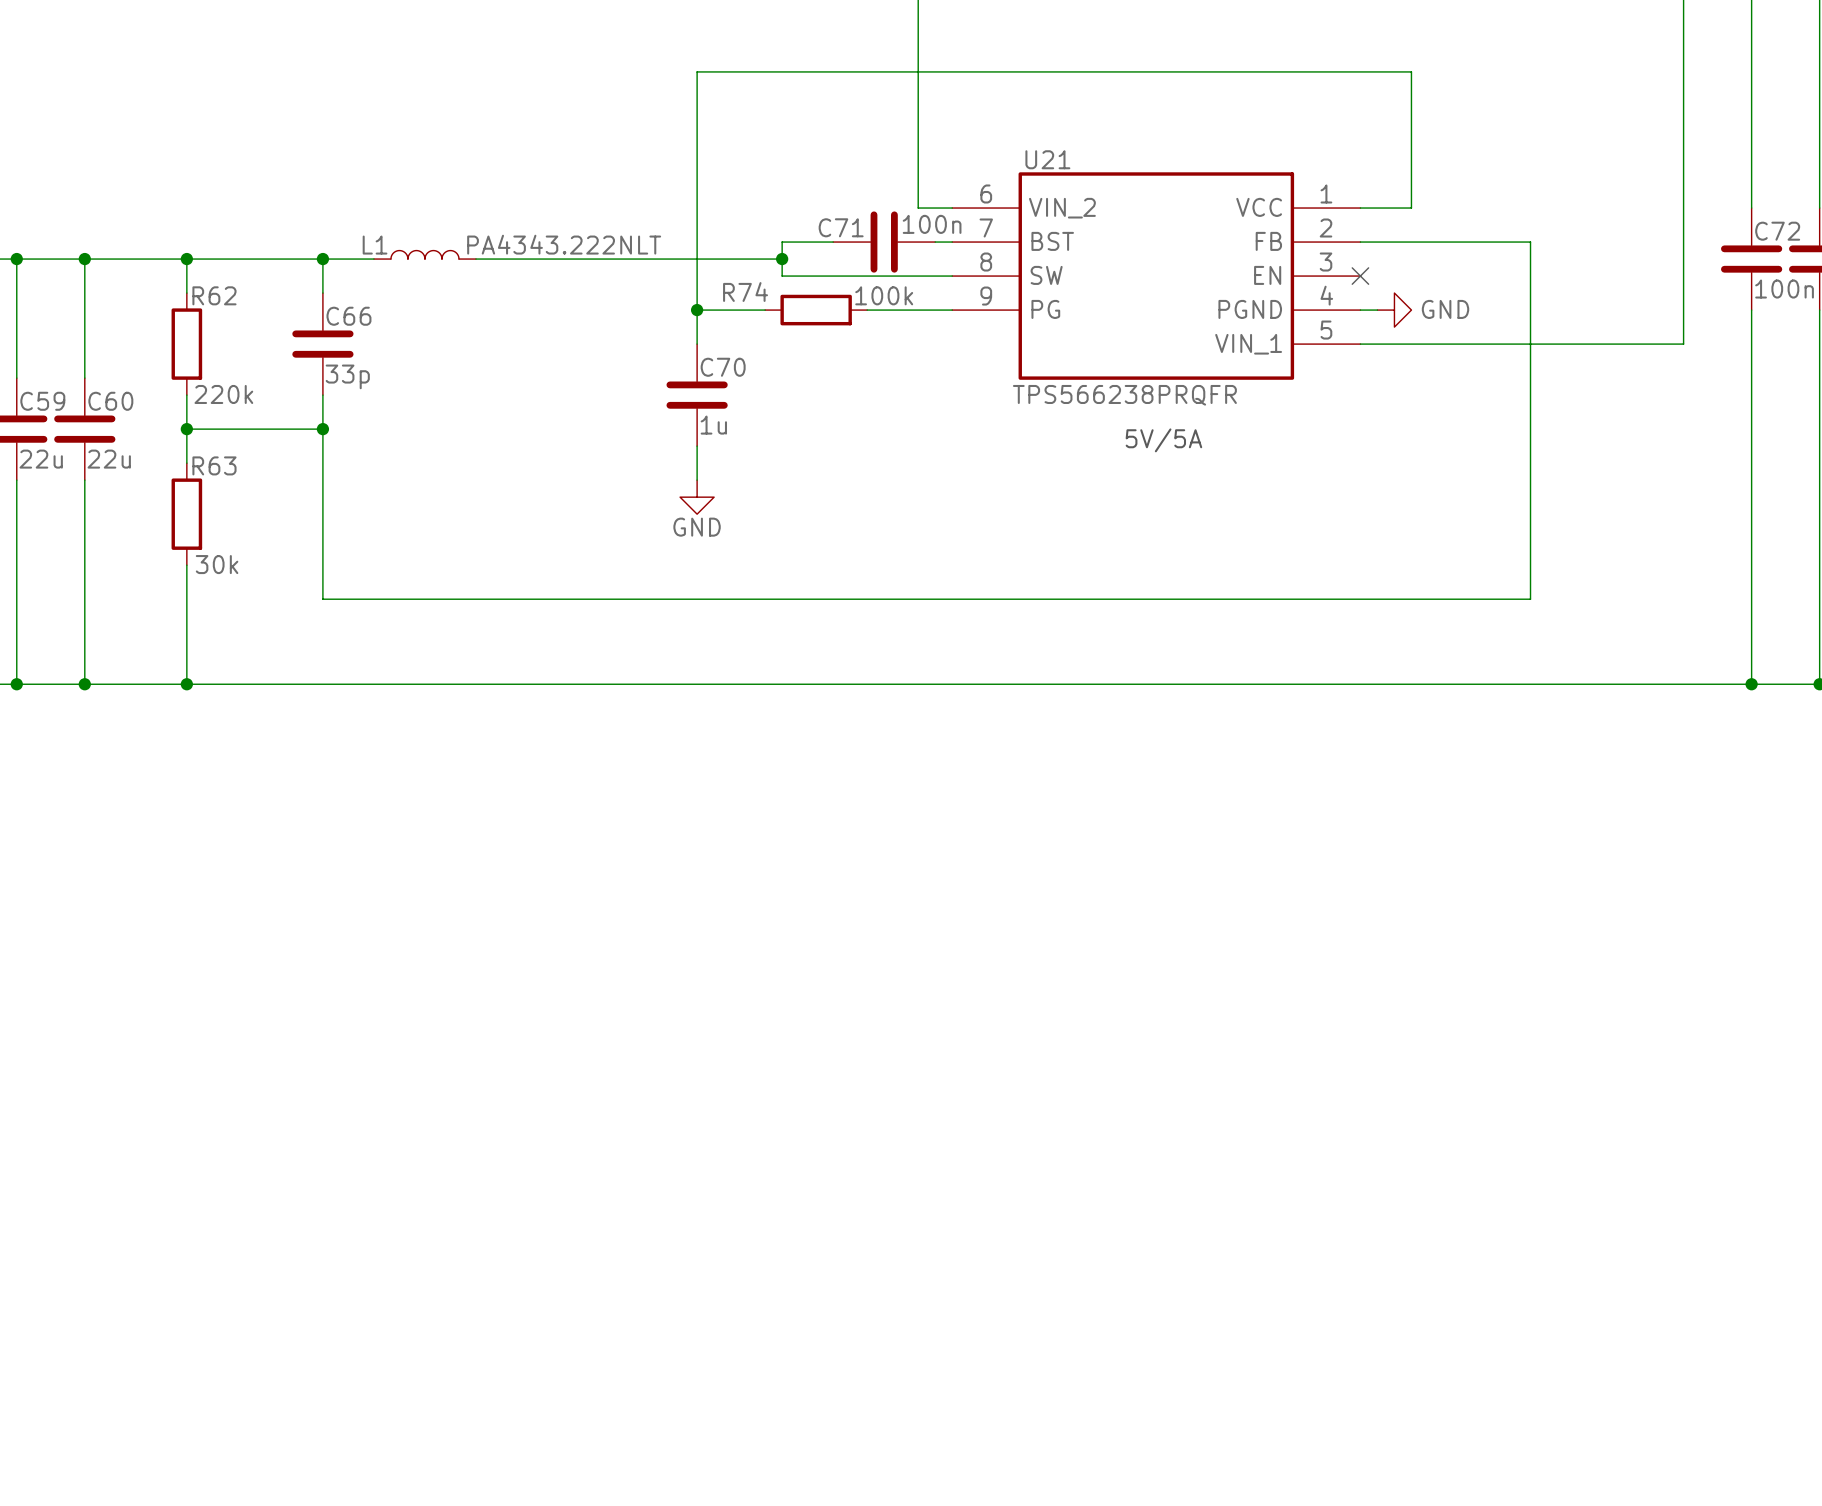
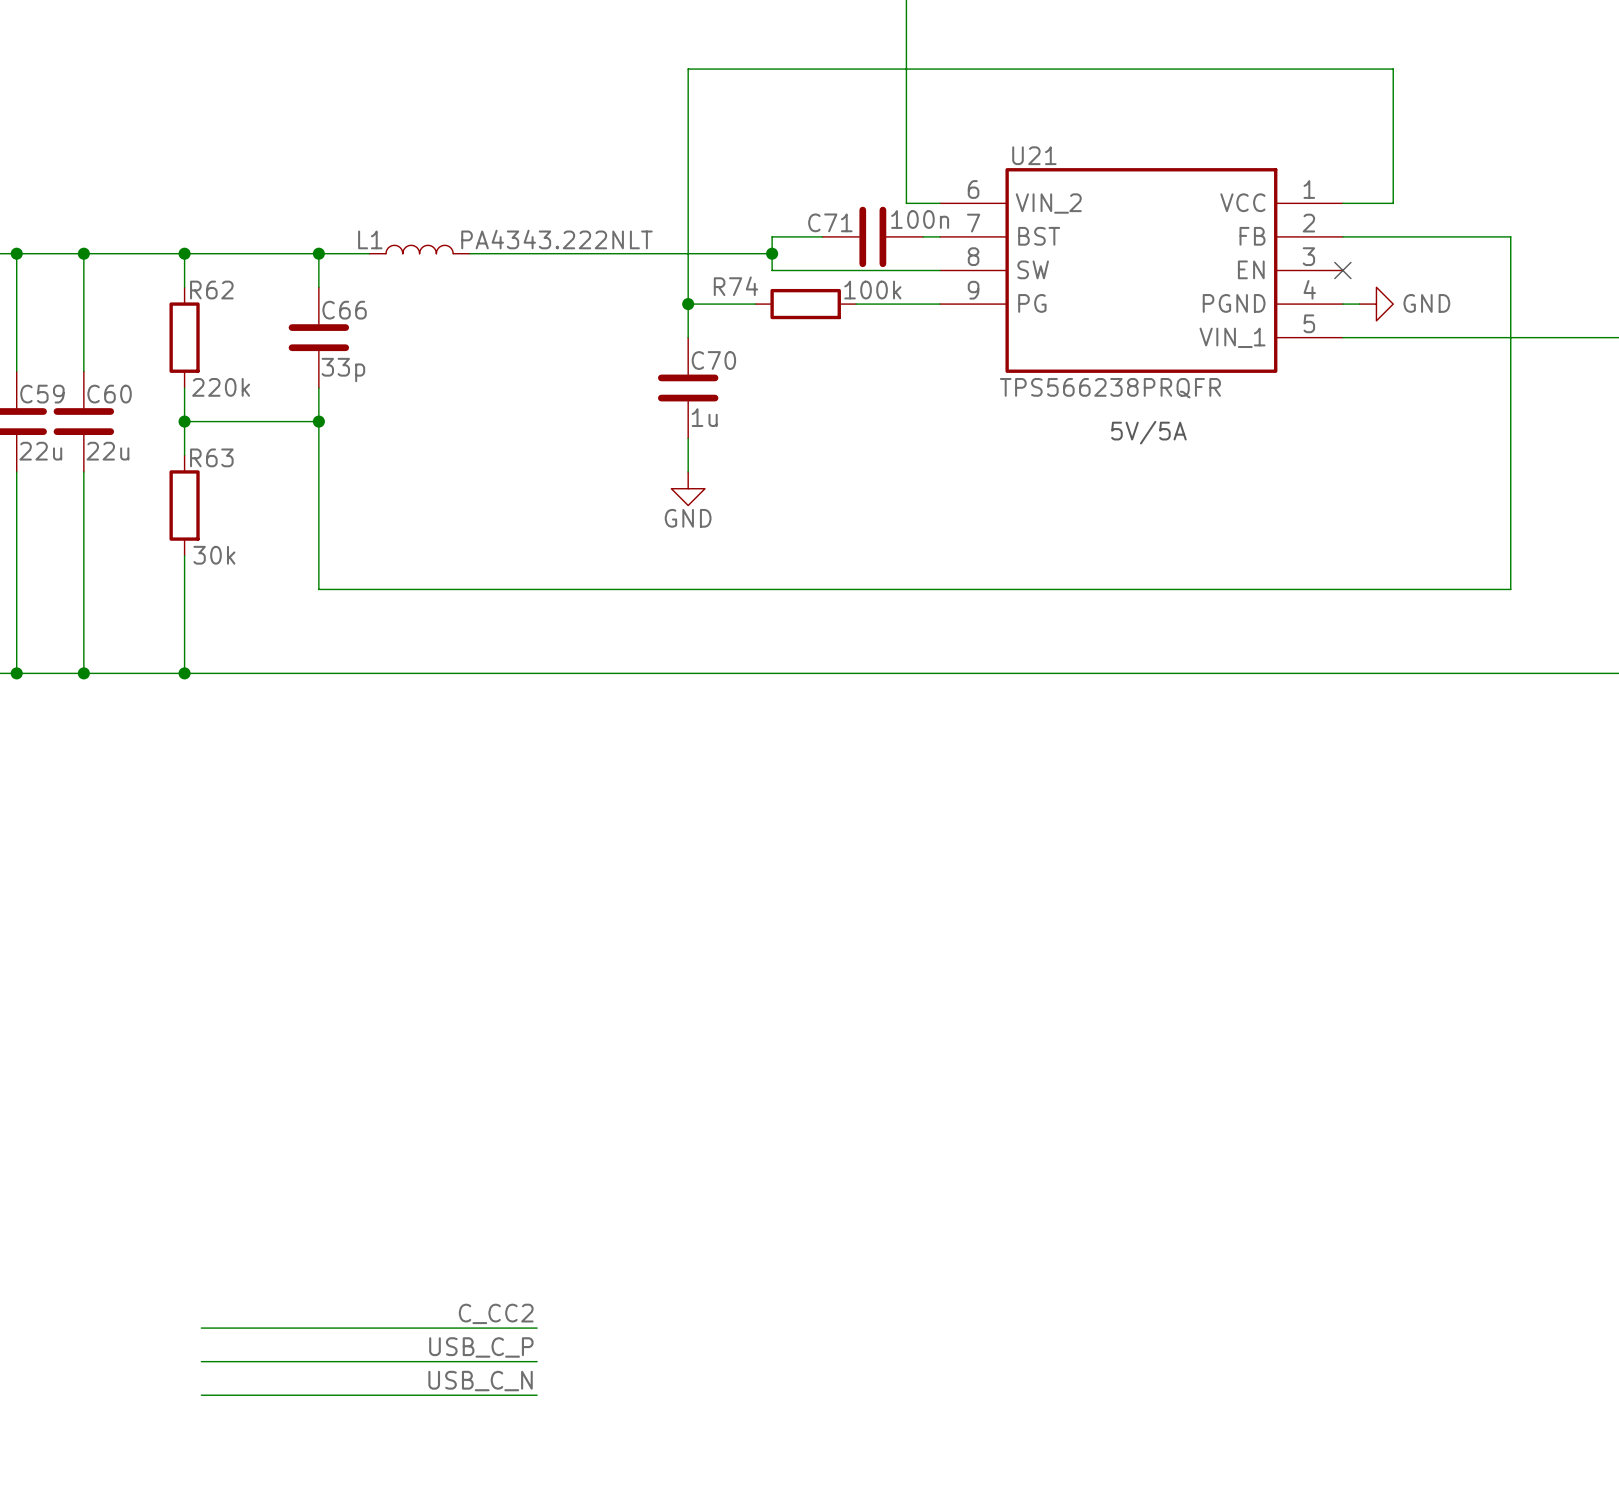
label: none -> C_CC2 (496, 1313)
wire: none -> (201, 1328) (537, 1328)
label: none -> USB_C_P (481, 1347)
wire: none -> (201, 1361) (537, 1361)
label: none -> USB_C_N (480, 1381)
wire: none -> (201, 1395) (537, 1395)

